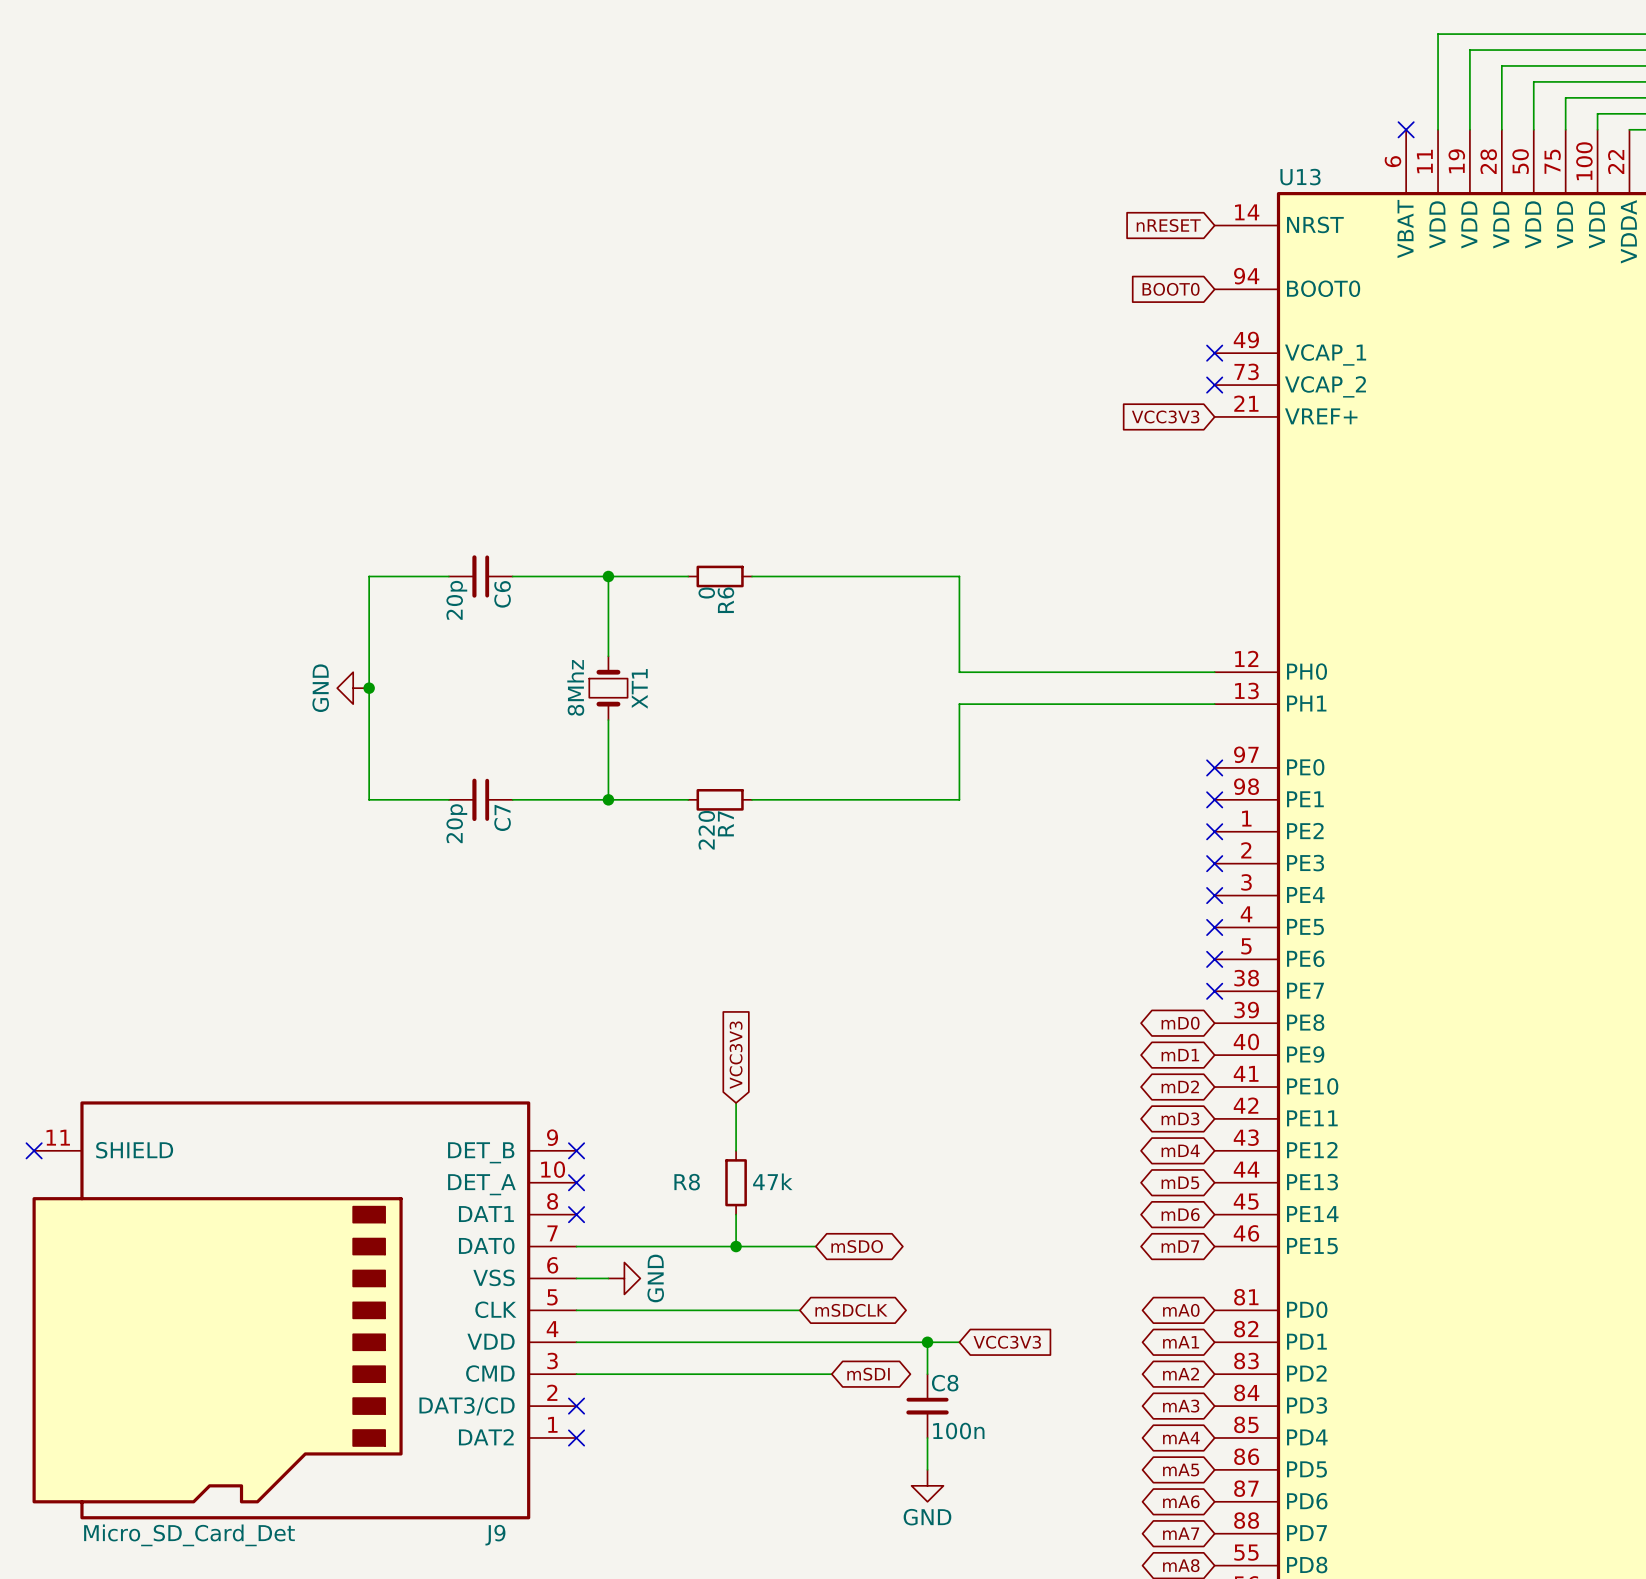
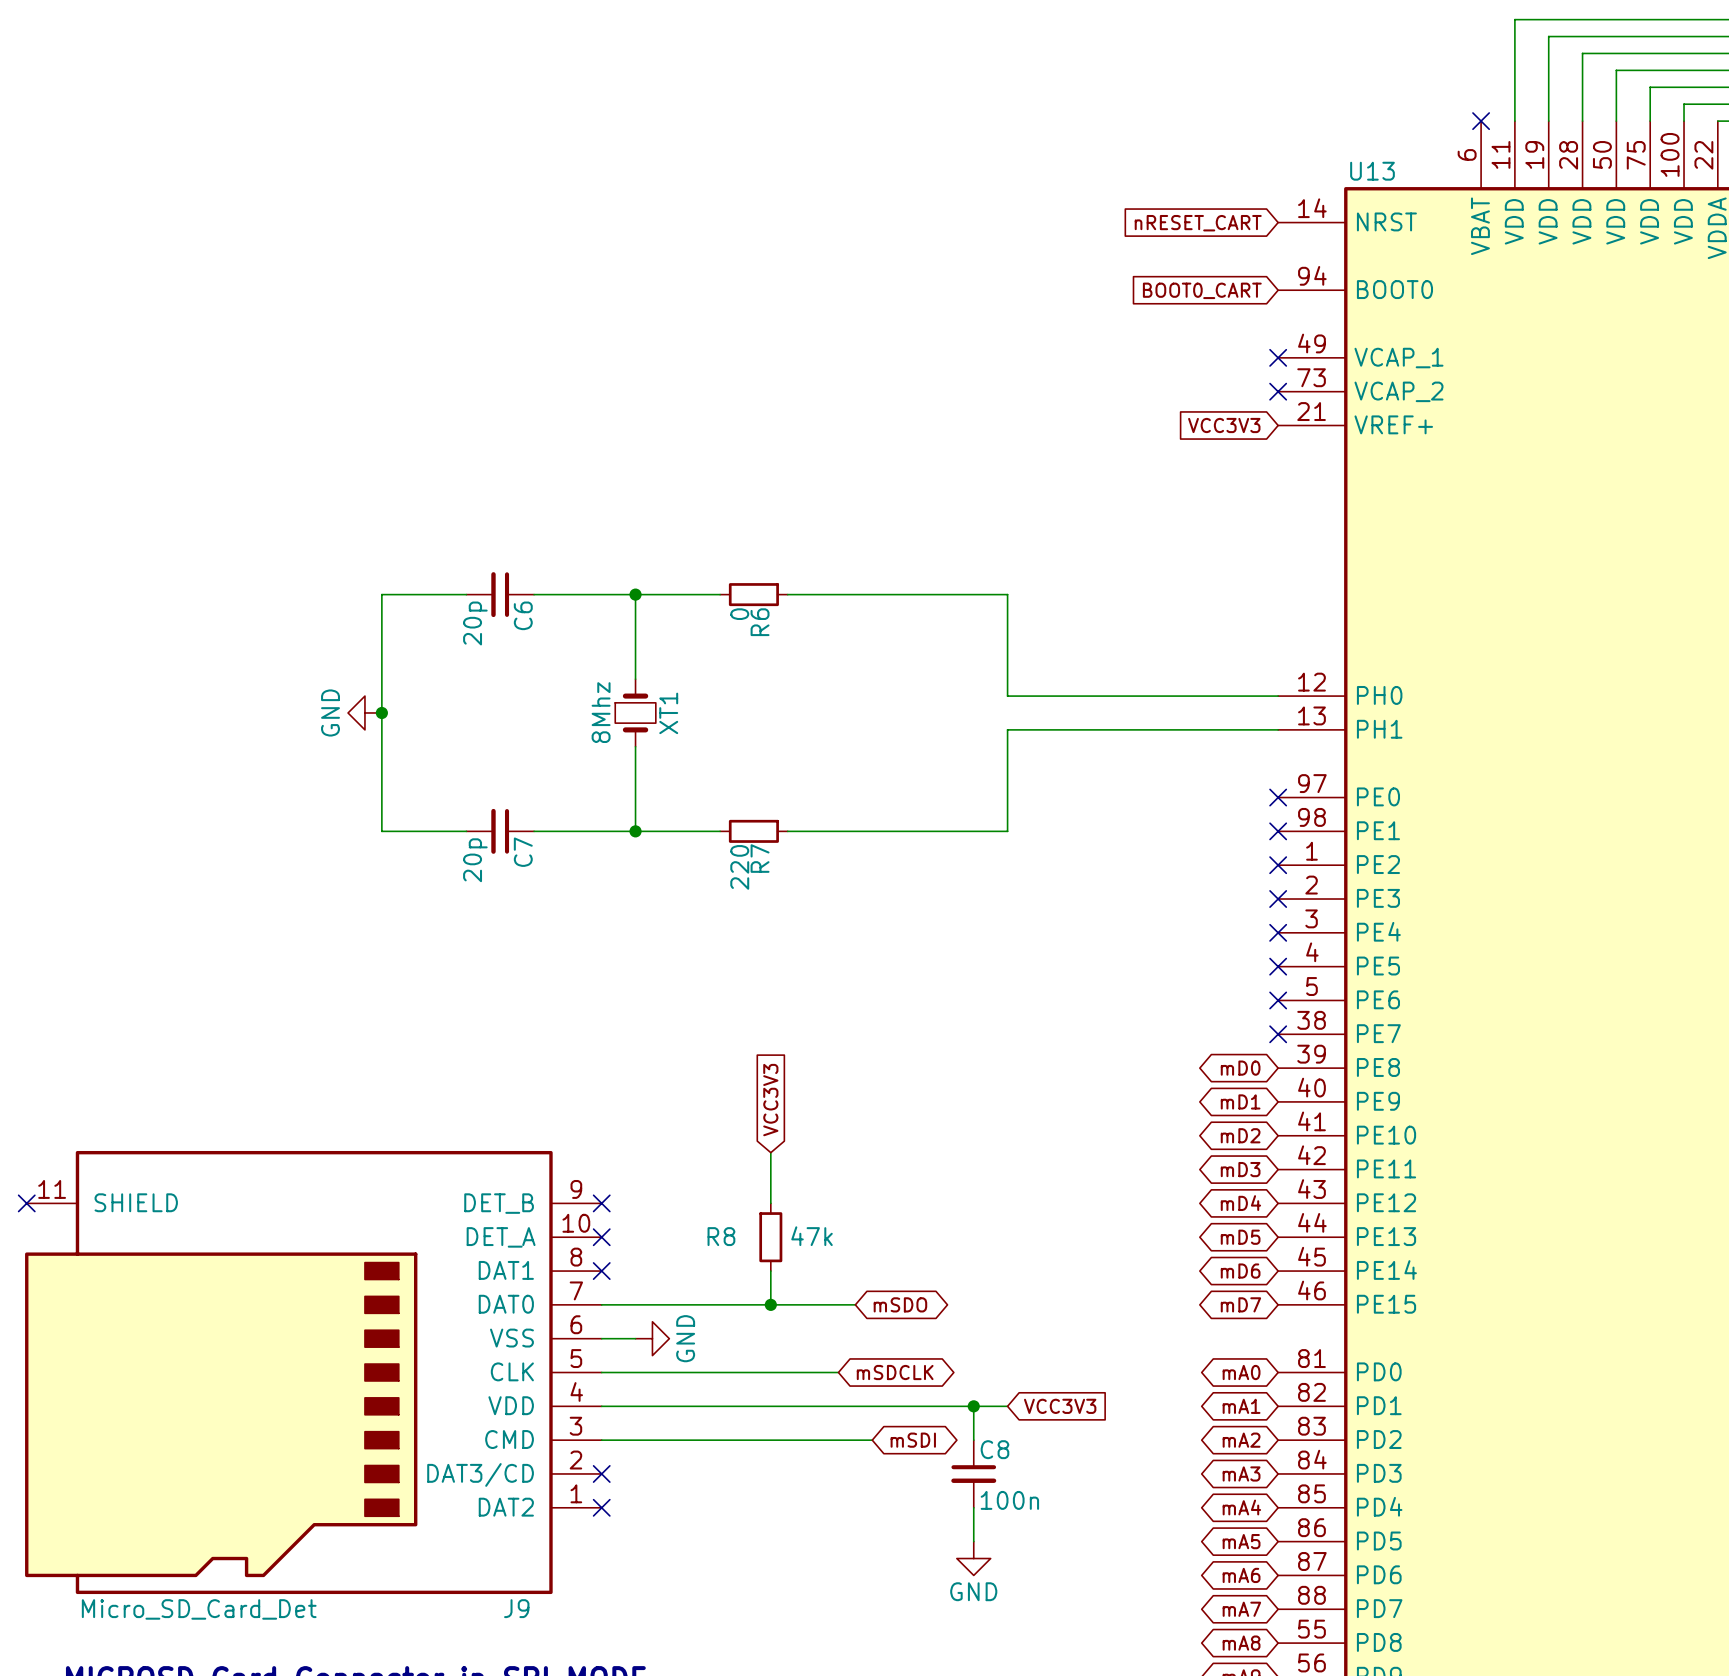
global label: nRESET (1168, 225) -> nRESET_CART (1198, 223)
global label: BOOT0 (1171, 289) -> BOOT0_CART (1202, 290)

